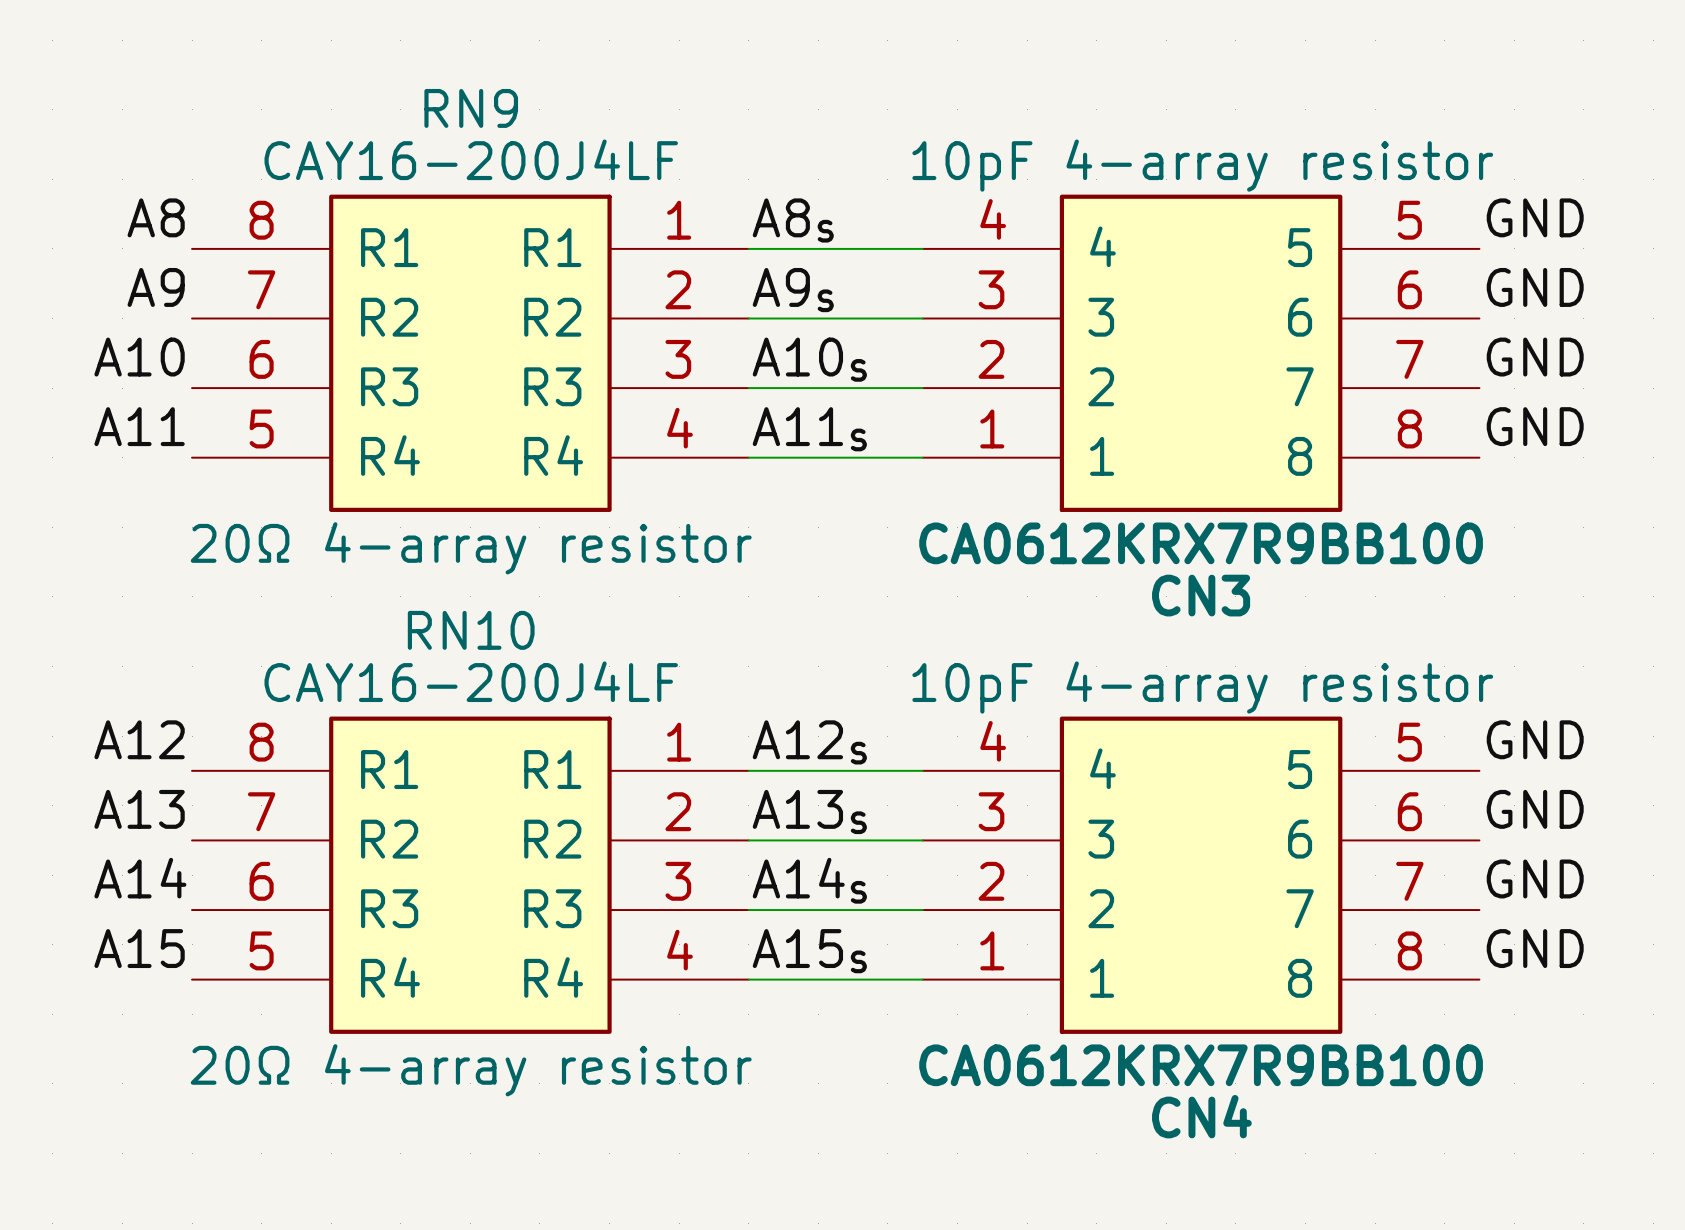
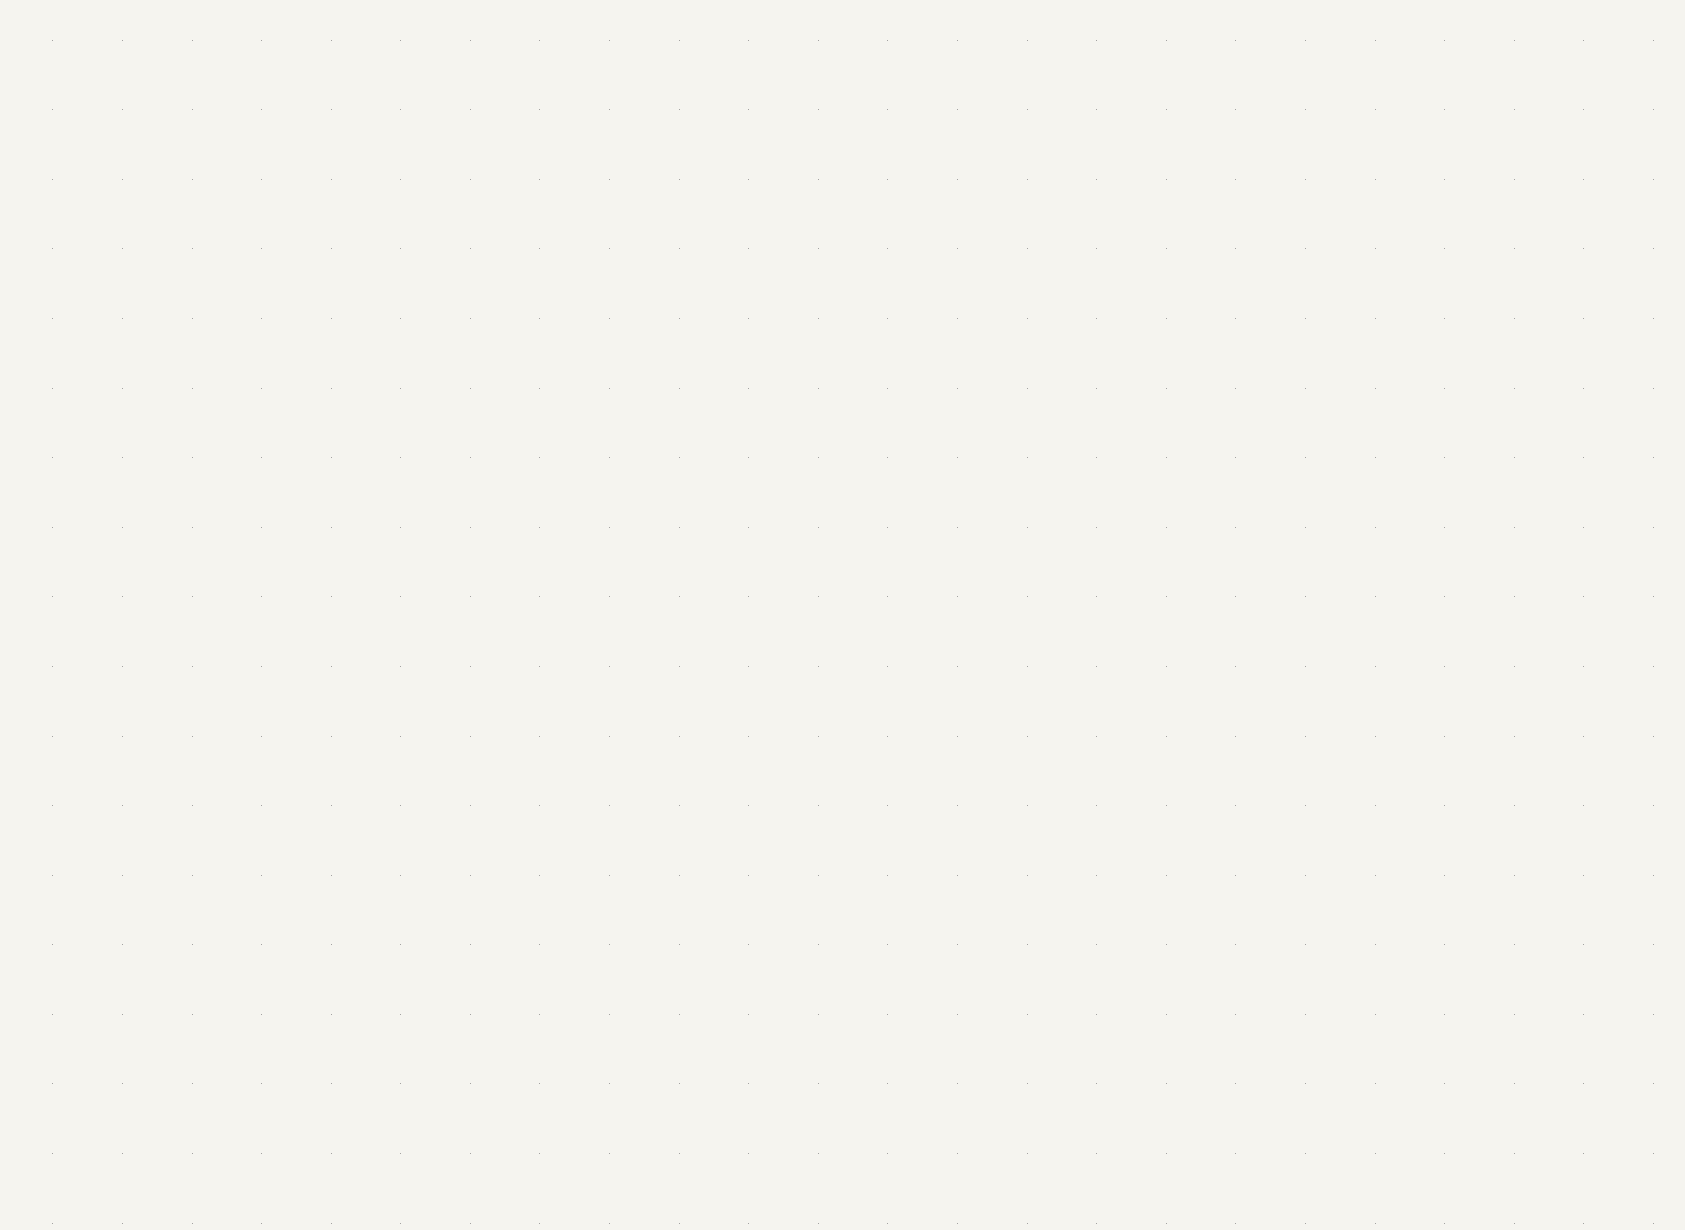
label: A8 (156, 217) -> none
label: GND (1535, 217) -> none
label: A8s (793, 220) -> none
wire: (748, 248) (922, 248) -> none
label: A9 (156, 287) -> none
label: GND (1535, 287) -> none
label: A9s (793, 290) -> none
wire: (748, 318) (922, 318) -> none
RN9: CAY16-200J4LF (470, 353) -> none
CN3: CA0612KRX7R9BB100 (1201, 353) -> none
label: A10 (139, 357) -> none
label: GND (1535, 357) -> none
label: A10s (809, 359) -> none
wire: (748, 388) (922, 388) -> none
label: A11 (139, 426) -> none
label: GND (1535, 426) -> none
label: A11s (809, 429) -> none
wire: (748, 457) (922, 457) -> none
label: A12 (139, 739) -> none
label: GND (1535, 739) -> none
label: A12s (809, 742) -> none
wire: (748, 770) (922, 770) -> none
label: A13 (139, 809) -> none
label: GND (1535, 809) -> none
label: A13s (809, 811) -> none
wire: (748, 840) (922, 840) -> none
RN10: CAY16-200J4LF (470, 875) -> none
CN4: CA0612KRX7R9BB100 (1201, 875) -> none
label: A14 (140, 878) -> none
label: GND (1535, 878) -> none
label: A14s (809, 880) -> none
wire: (748, 910) (922, 910) -> none
label: A15 (139, 948) -> none
label: GND (1535, 948) -> none
label: A15s (809, 951) -> none
wire: (748, 979) (922, 979) -> none

